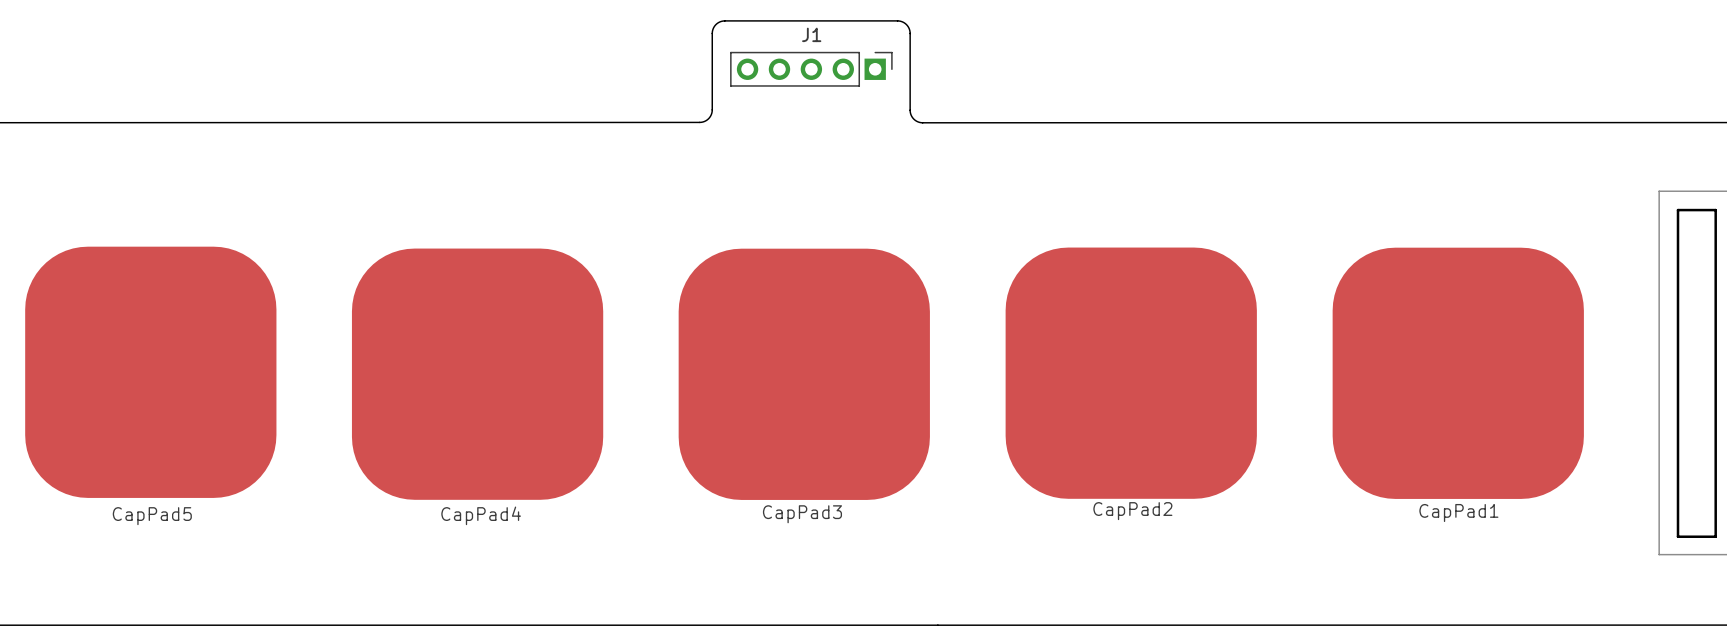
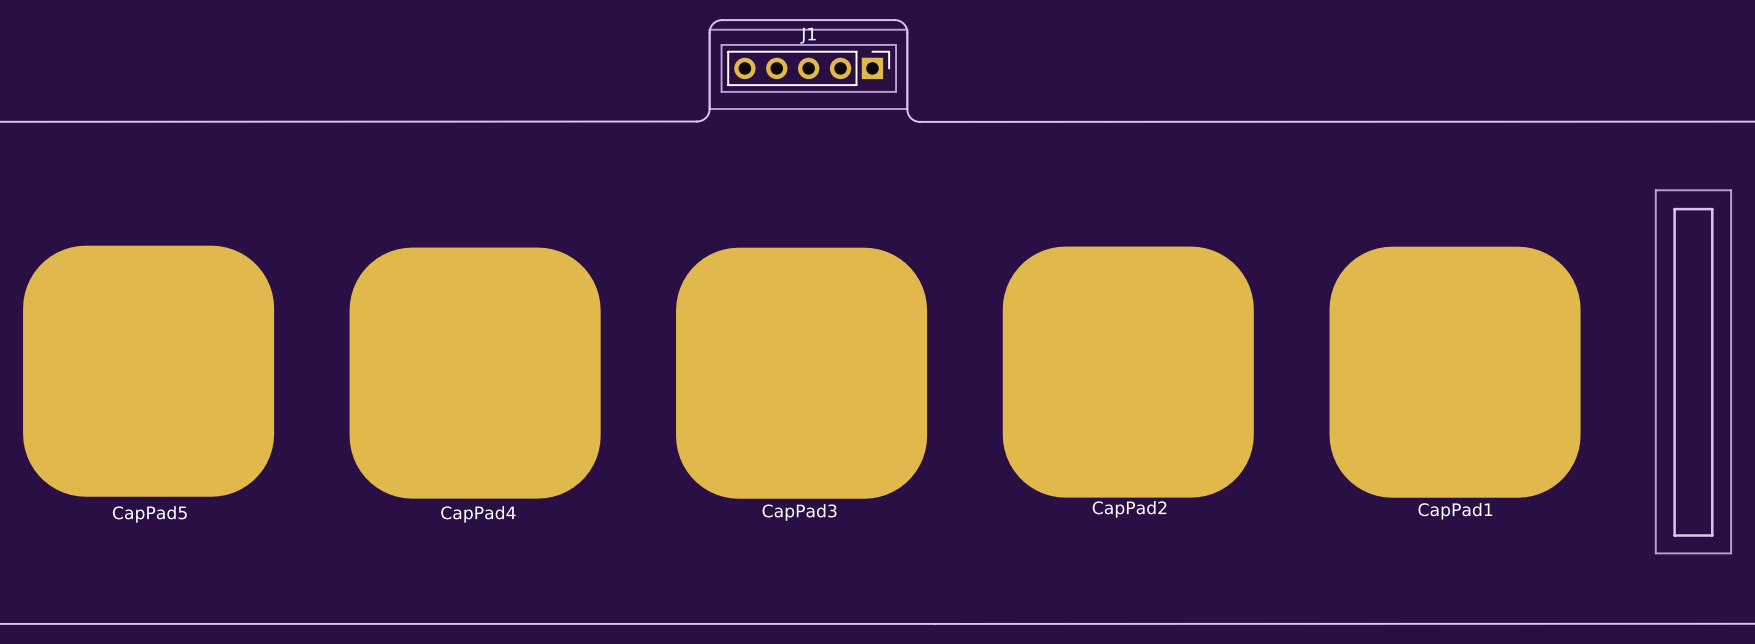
line: none -> (709, 29) (907, 29) (907, 108) (709, 108) (709, 29)
line: none -> (721, 44) (896, 44) (896, 91) (721, 91) (721, 44)

